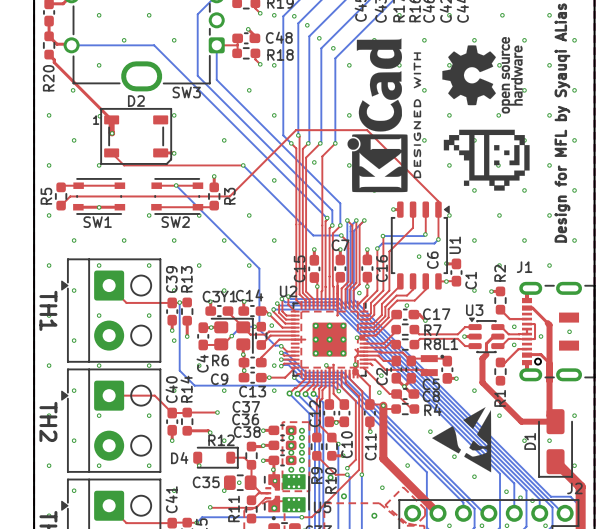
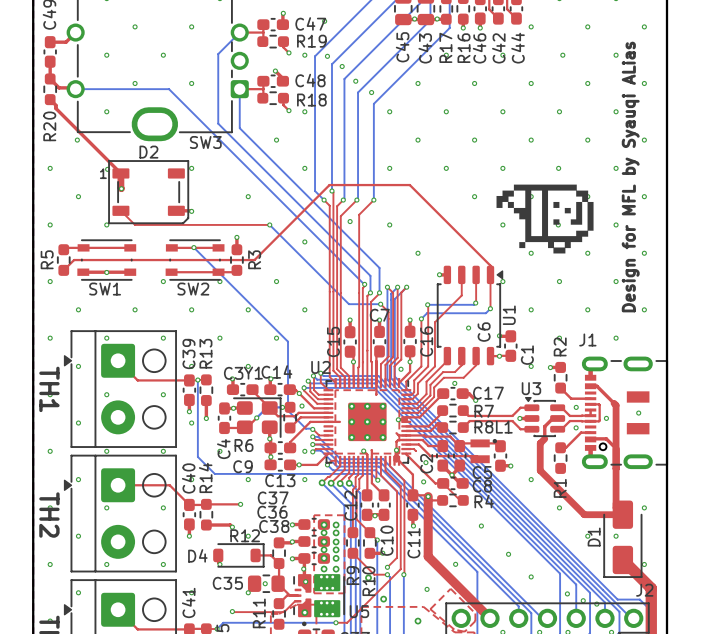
drawing: [442, 37, 523, 114] -> none
drawing: [347, 38, 422, 193] -> none
drawing: [432, 407, 492, 473] -> none

